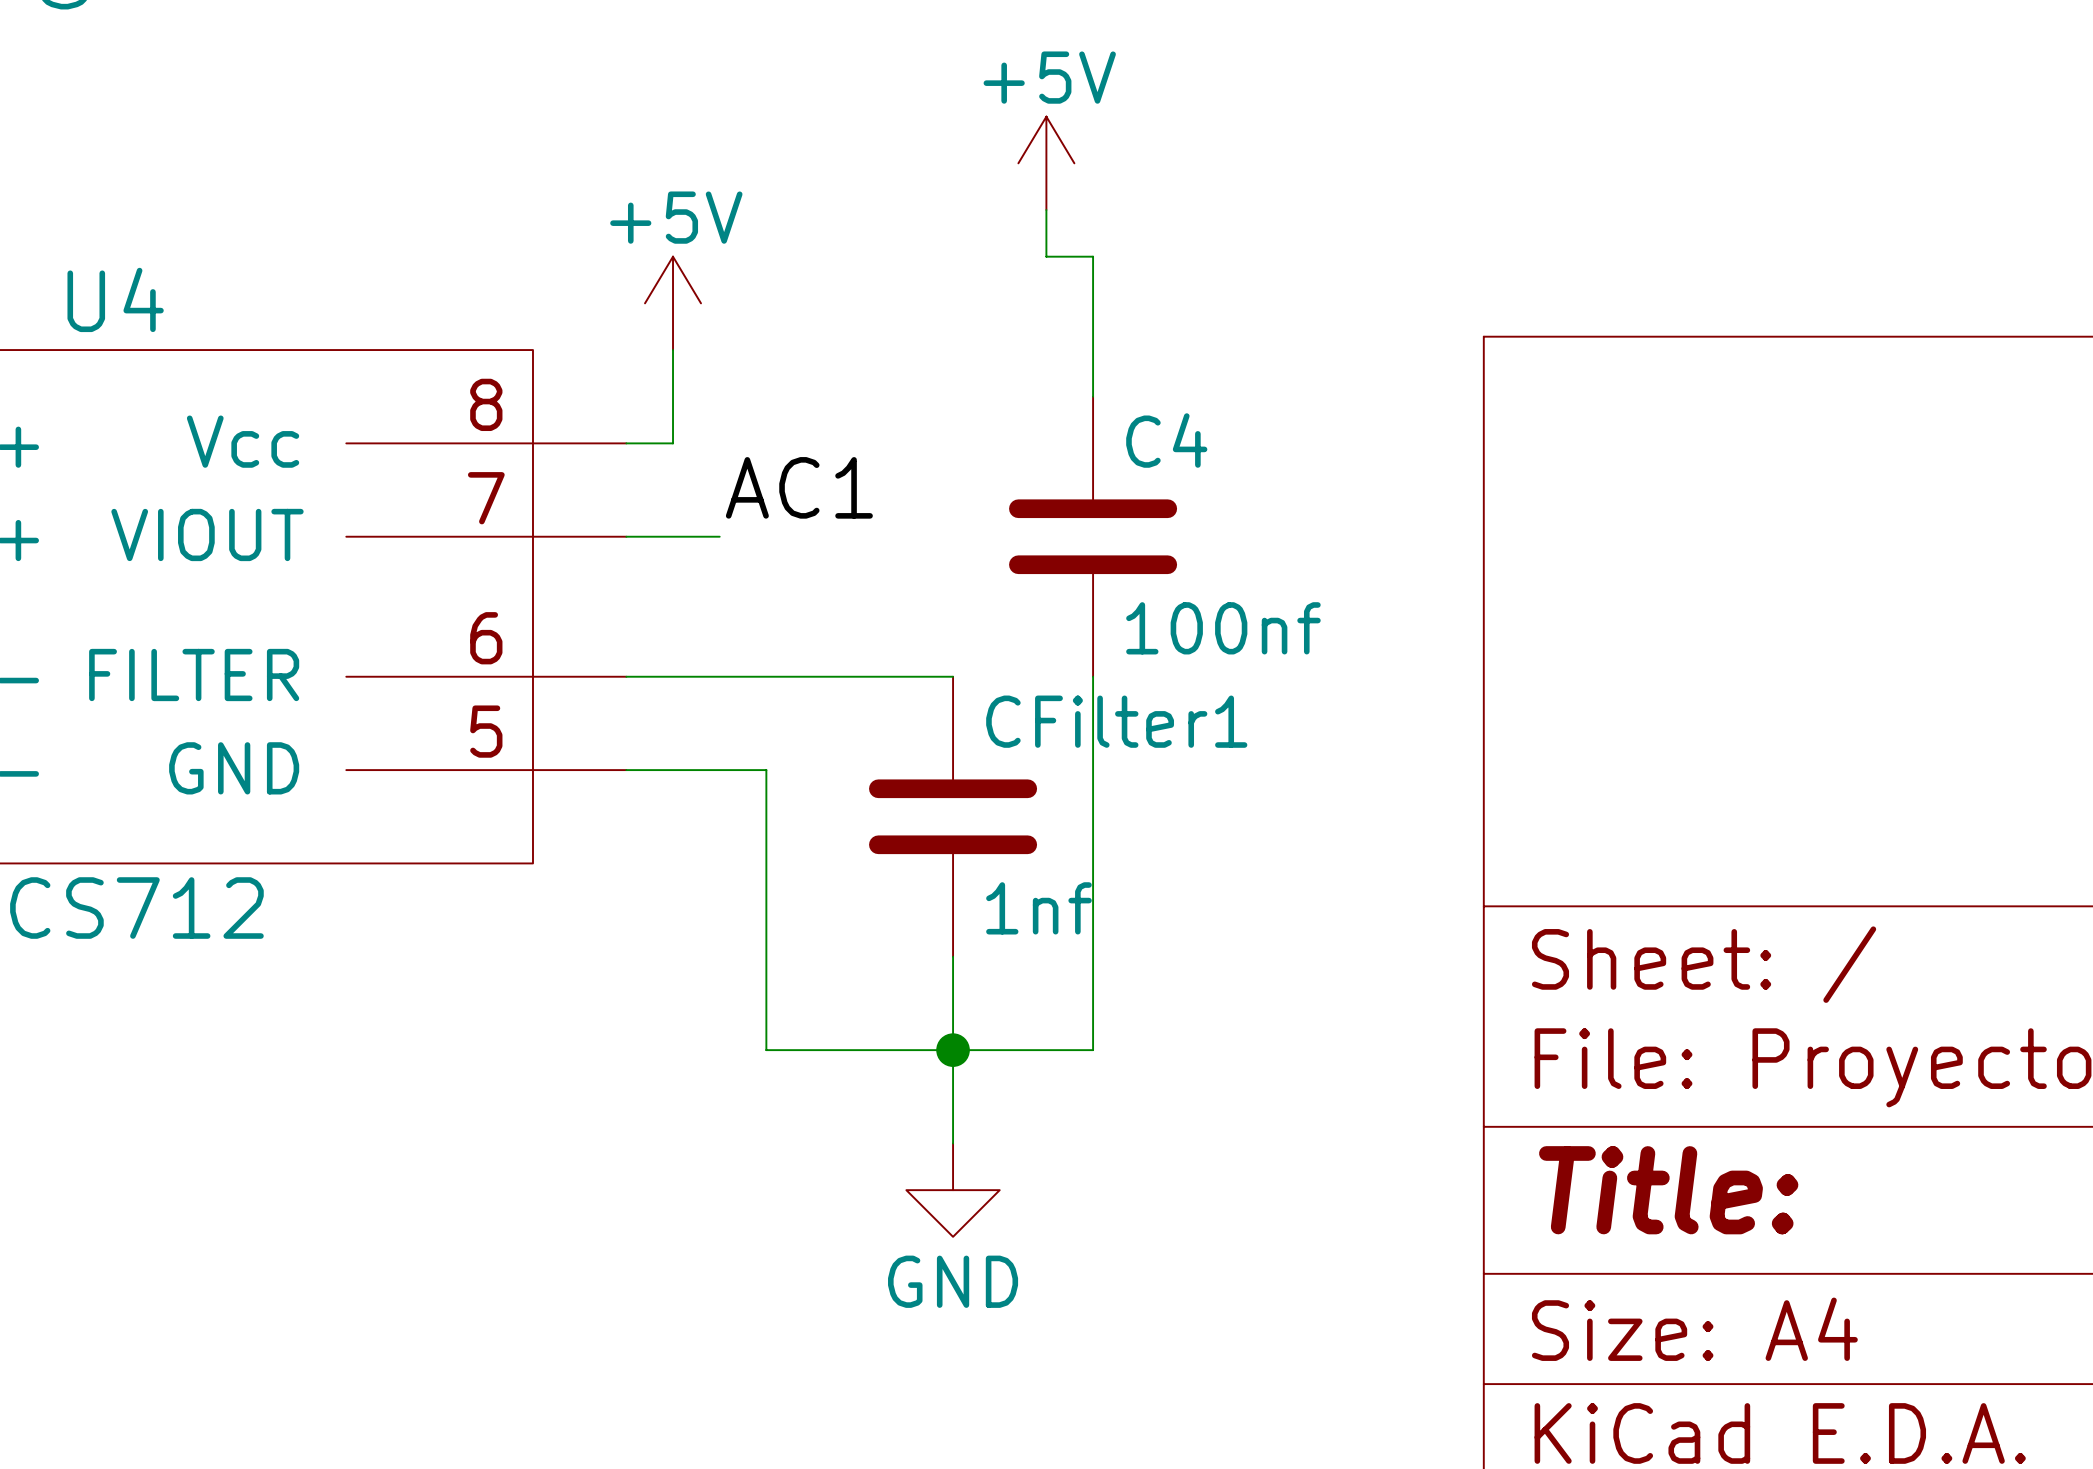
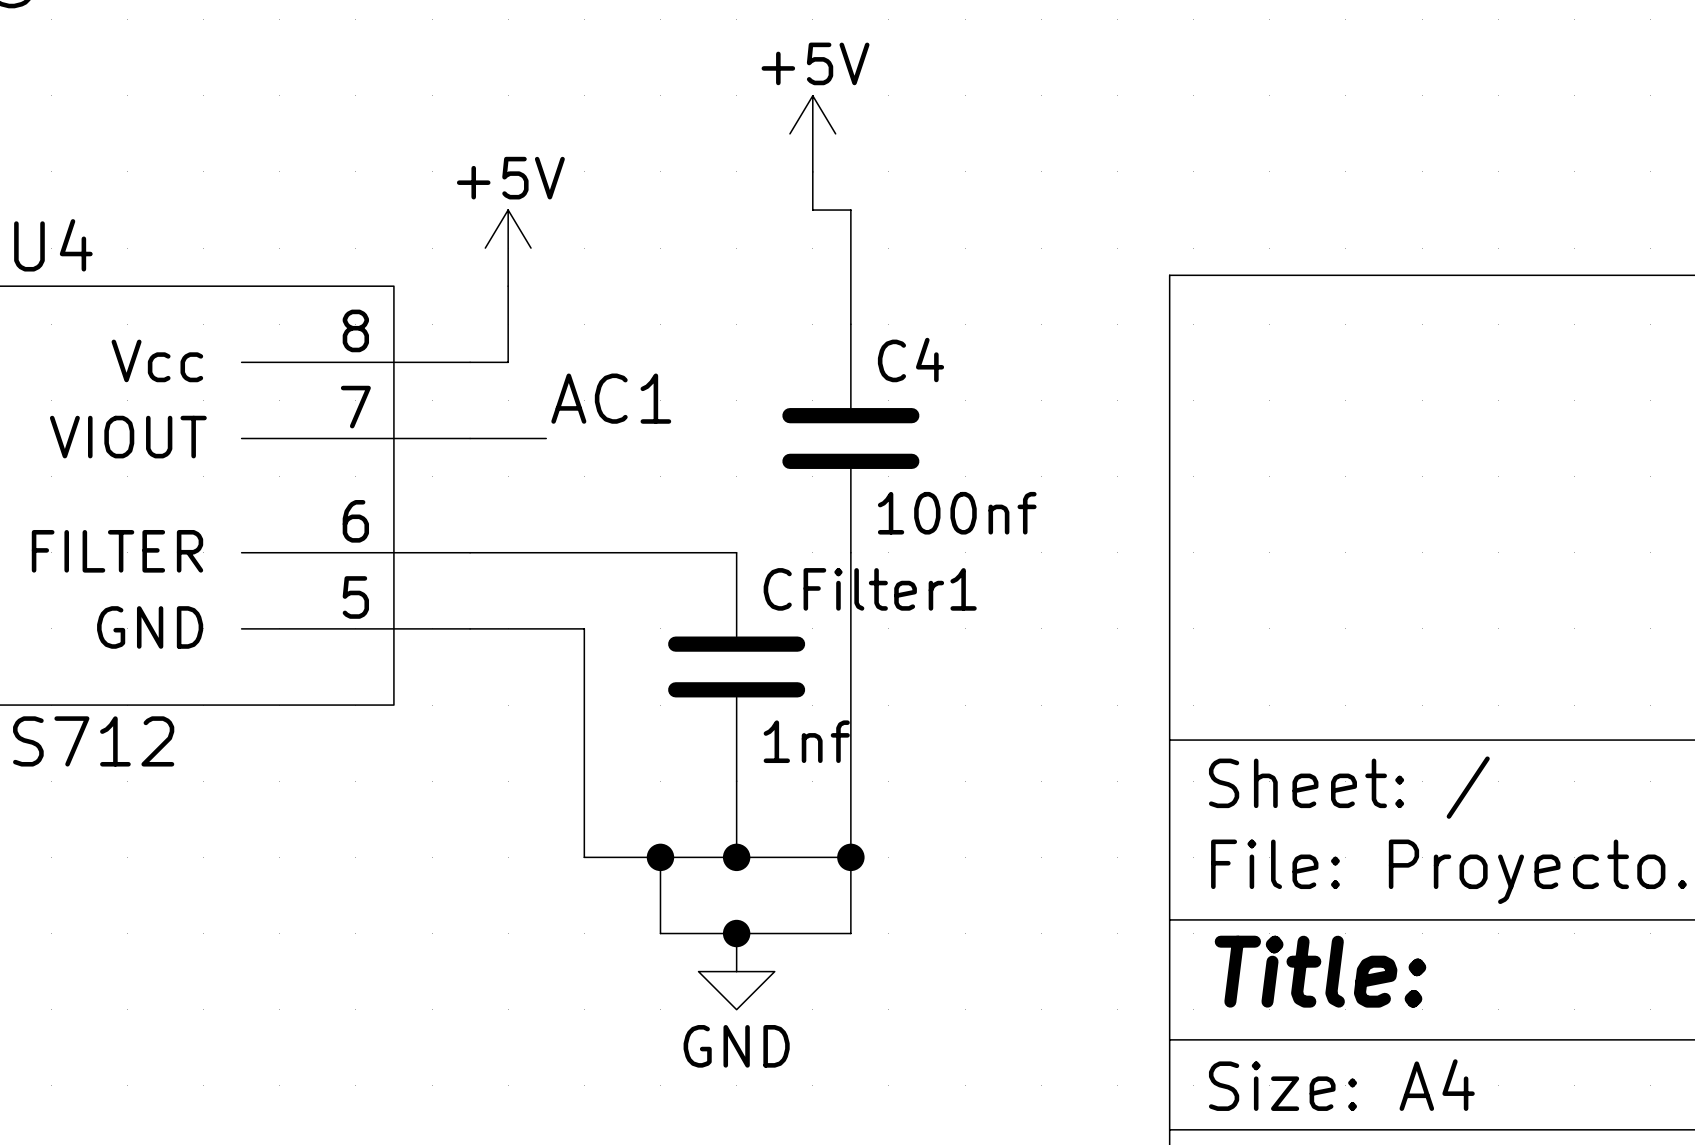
wire: none -> (660, 857) (660, 933) (850, 933) (850, 857)
junction: none -> (660, 857)
wire: (953, 1050) (953, 1143) -> none
junction: none -> (850, 857)
junction: none -> (736, 933)

